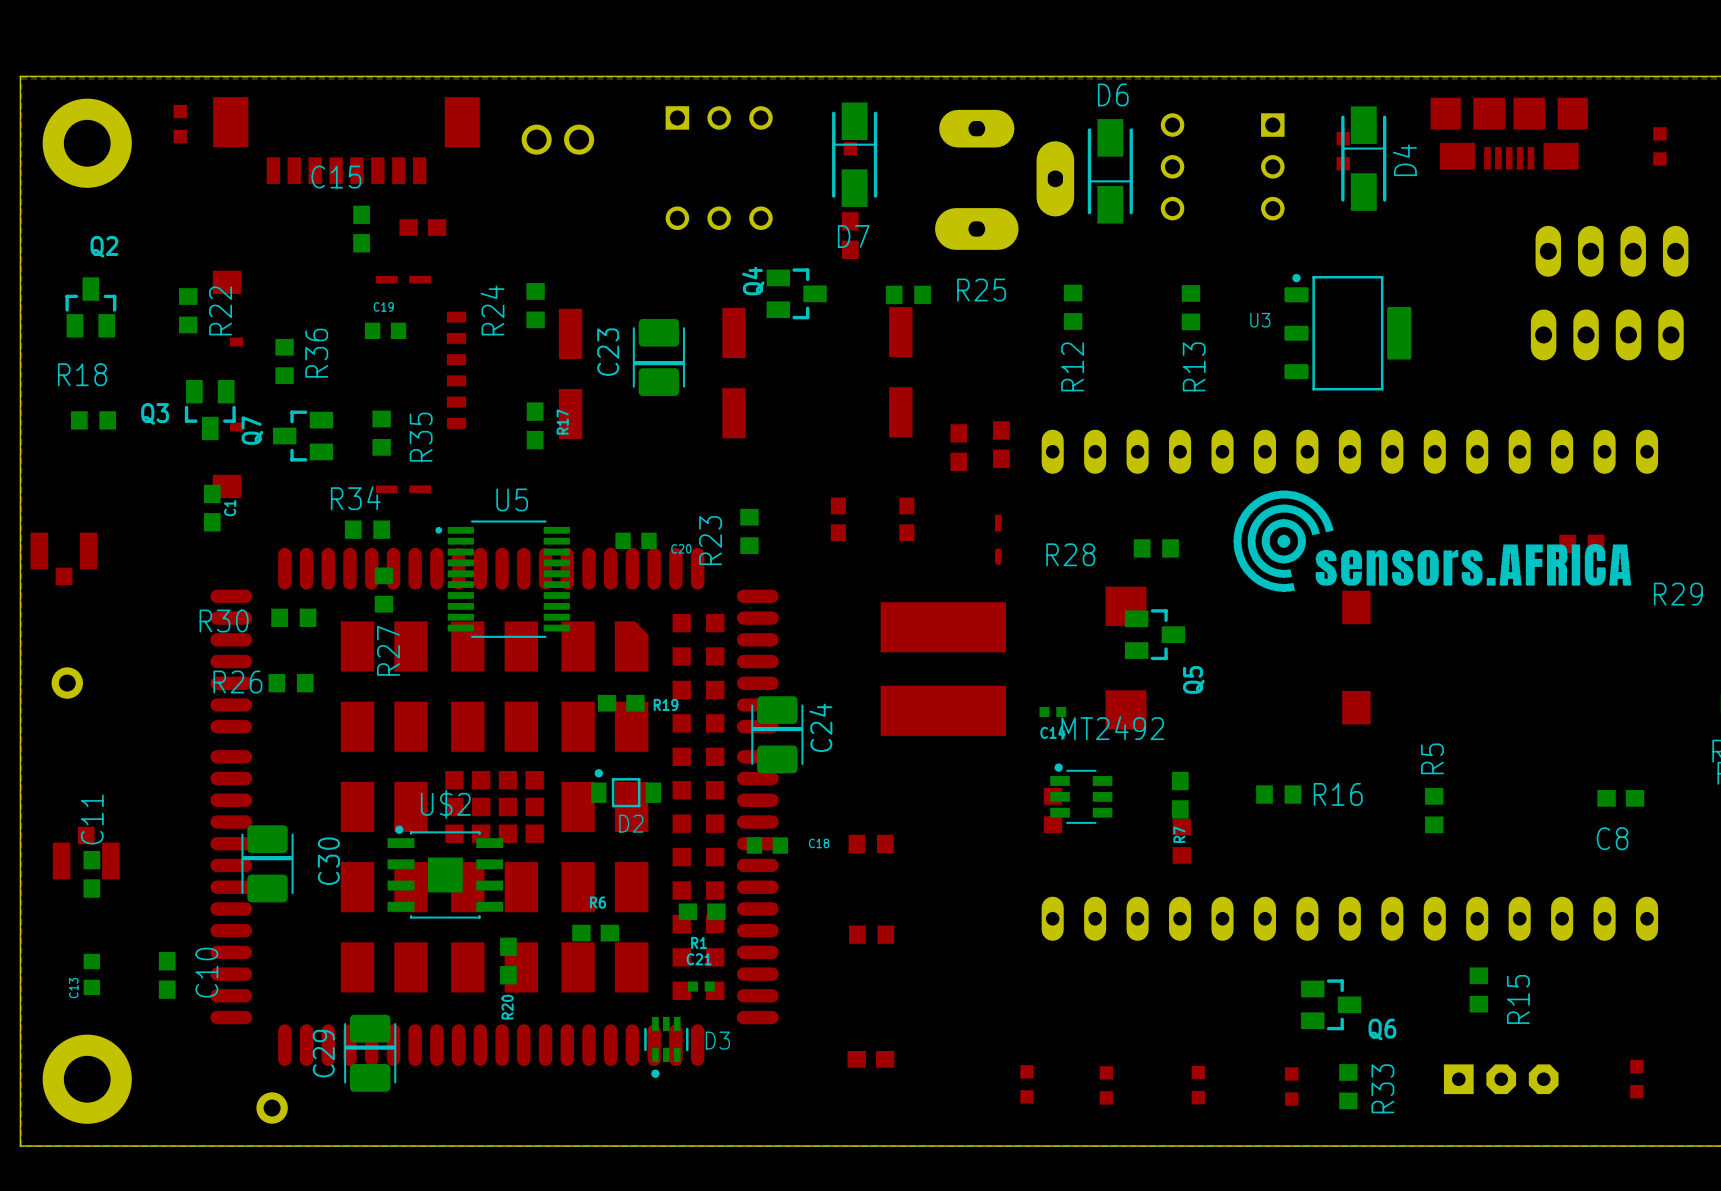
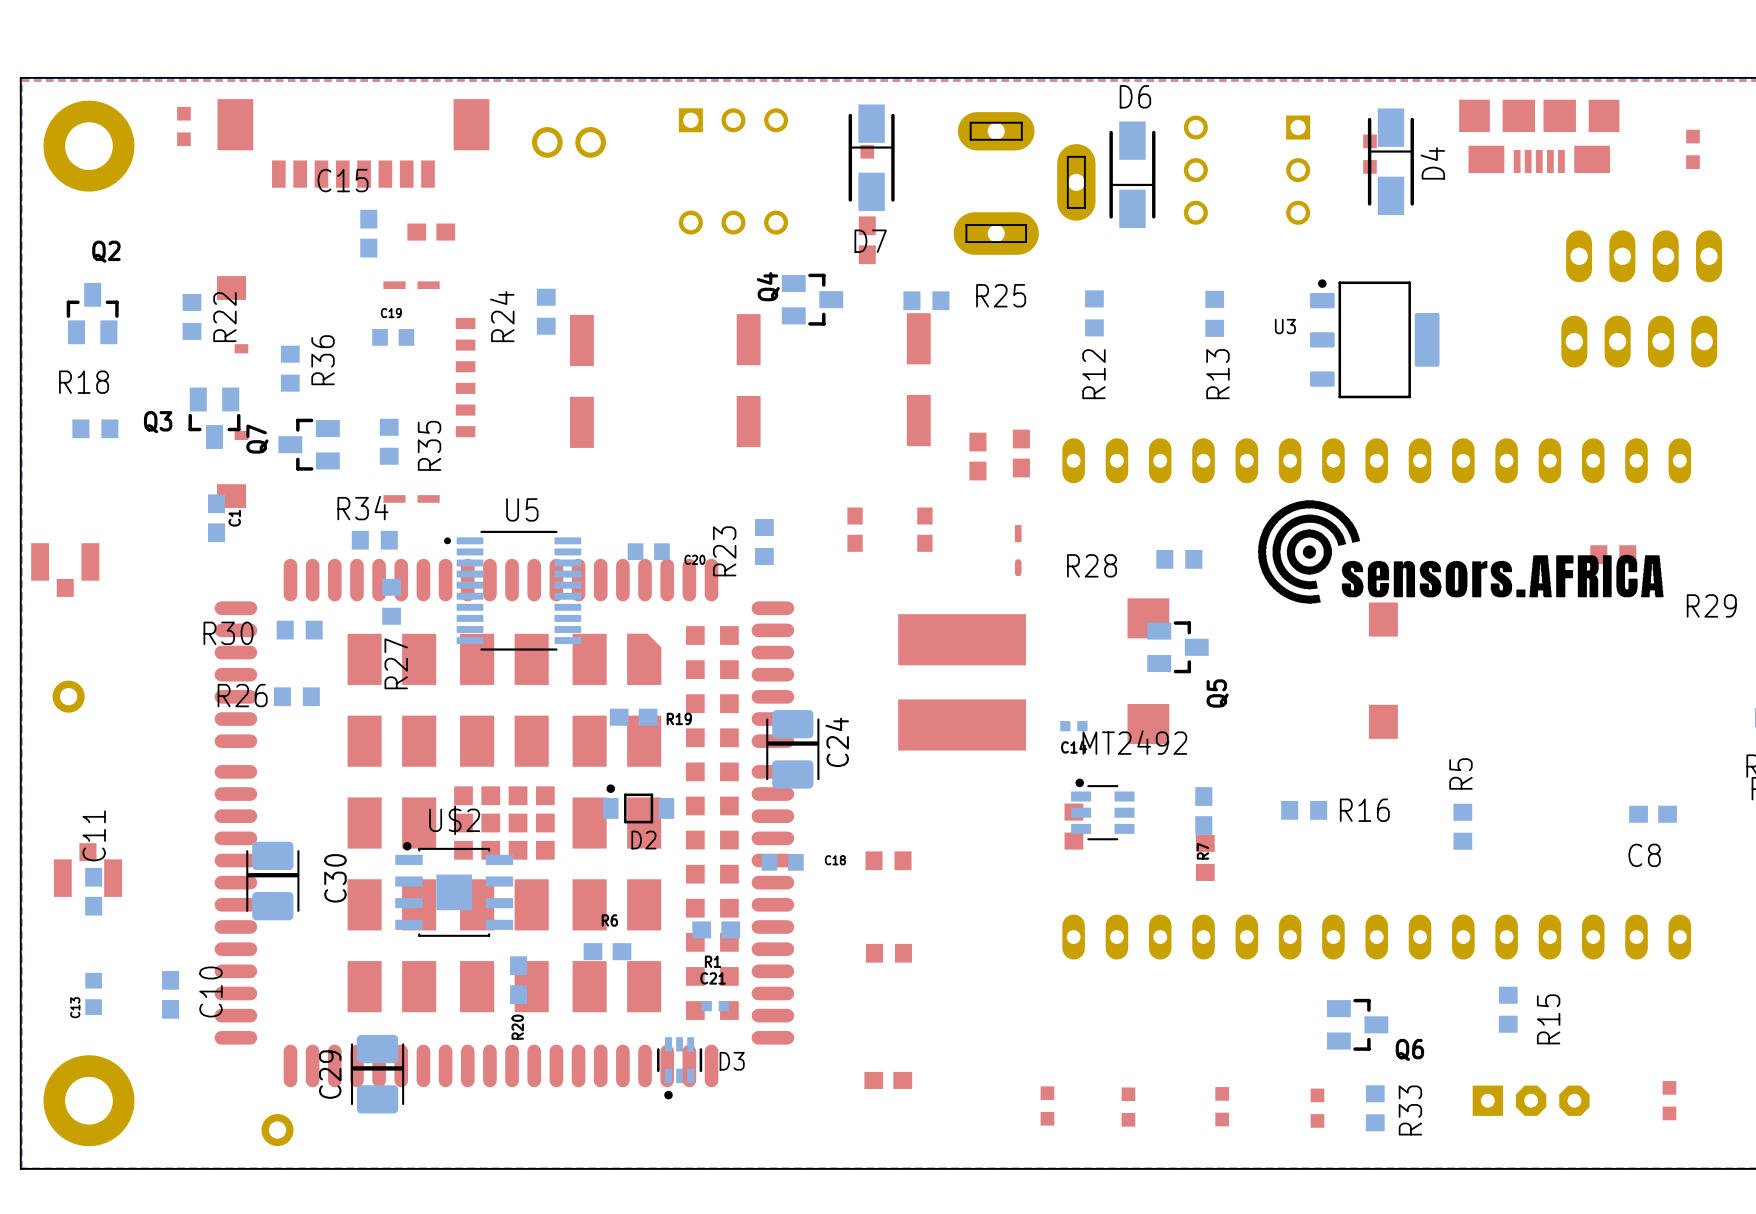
C23: (658, 357) -> none
R17: (535, 425) -> none

